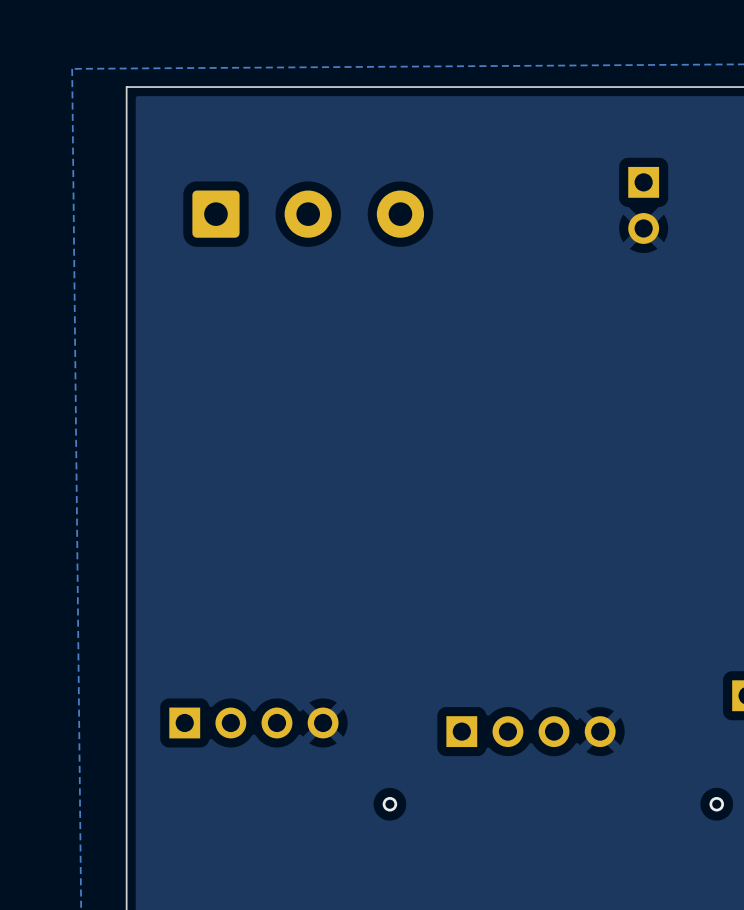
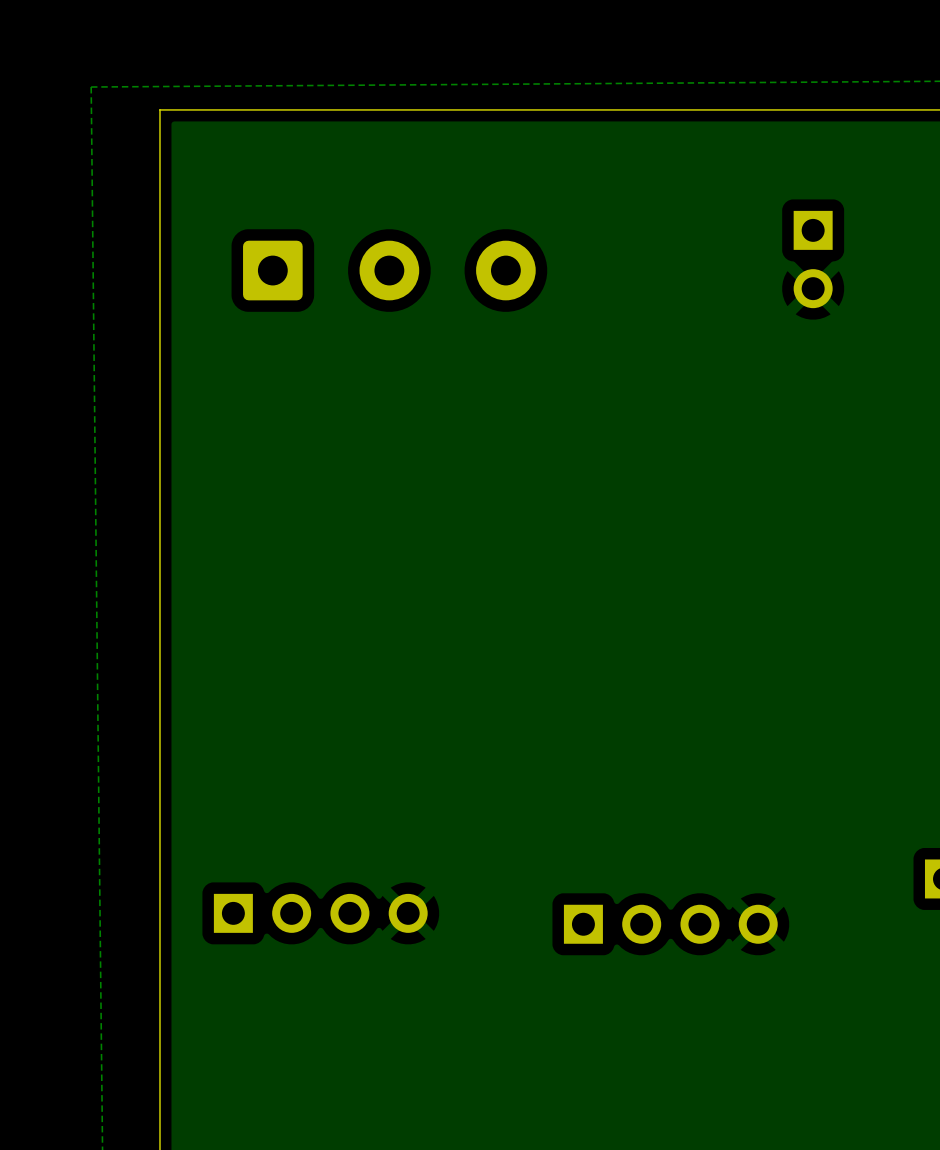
via: (389, 804) -> none
via: (716, 804) -> none

